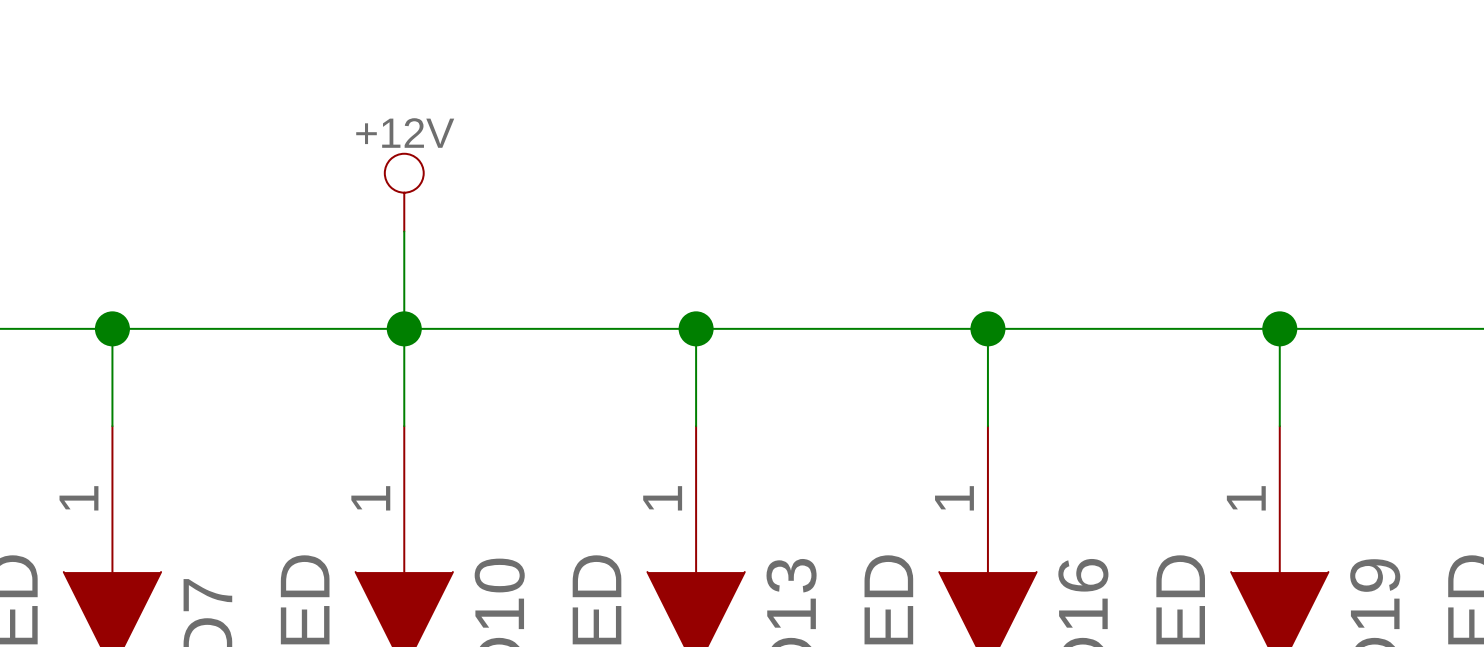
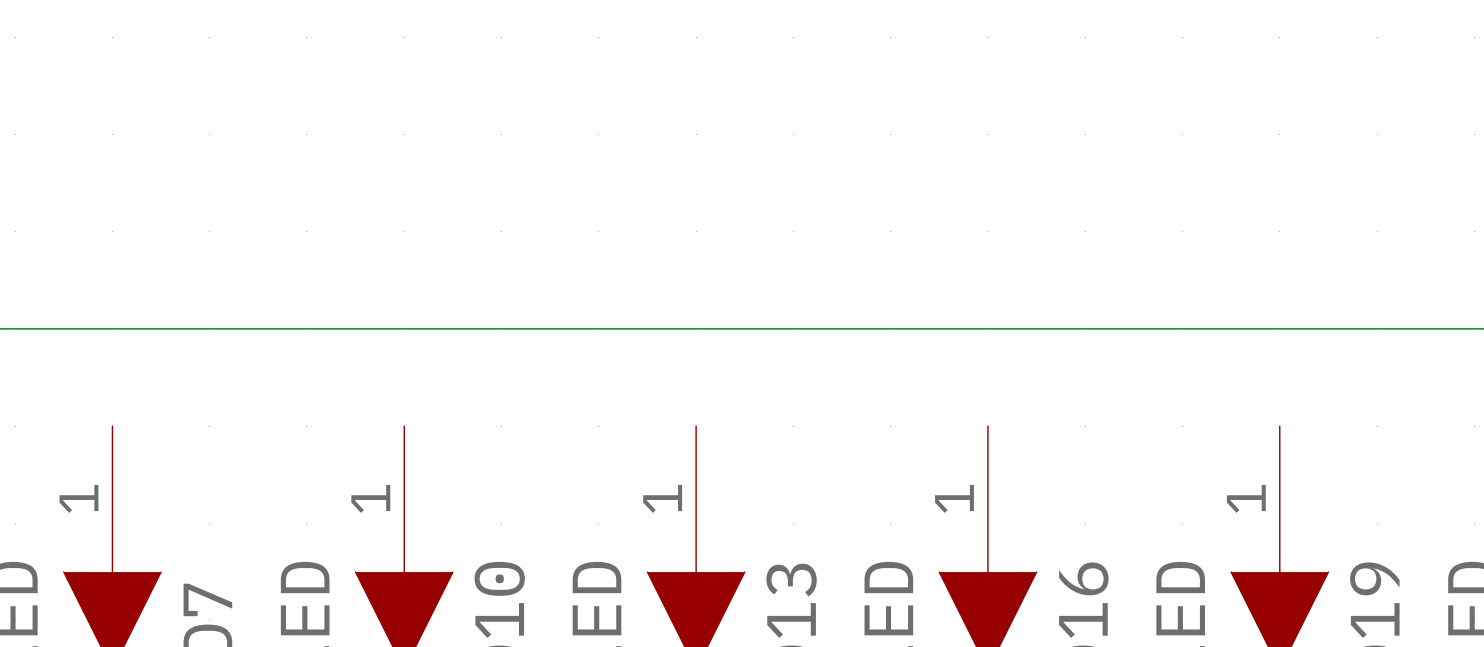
power symbol: +12V (404, 192) -> none
wire: (404, 231) (404, 426) -> none
wire: (112, 328) (112, 426) -> none
junction: (112, 328) -> none
junction: (404, 328) -> none
wire: (696, 328) (696, 426) -> none
junction: (696, 328) -> none
wire: (987, 328) (987, 426) -> none
junction: (987, 328) -> none
wire: (1279, 328) (1279, 426) -> none
junction: (1279, 328) -> none

